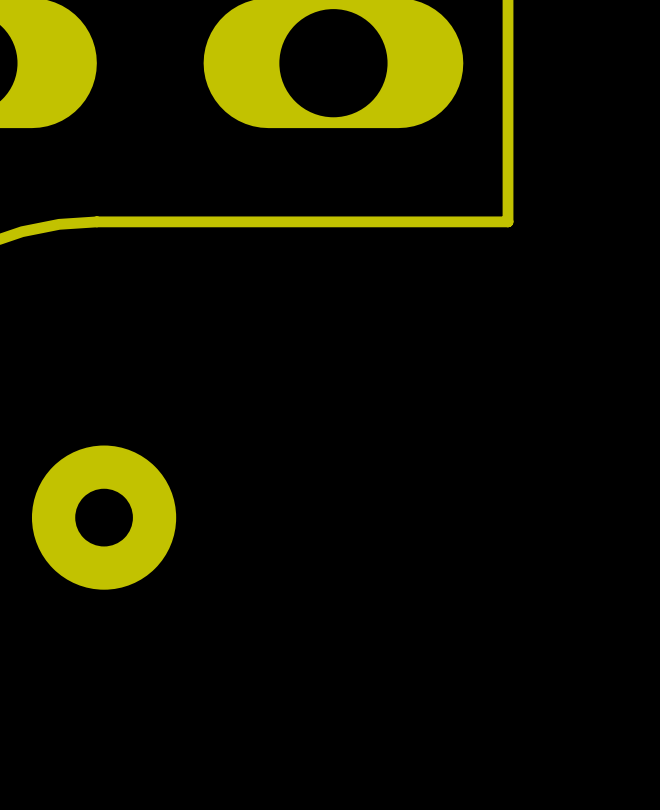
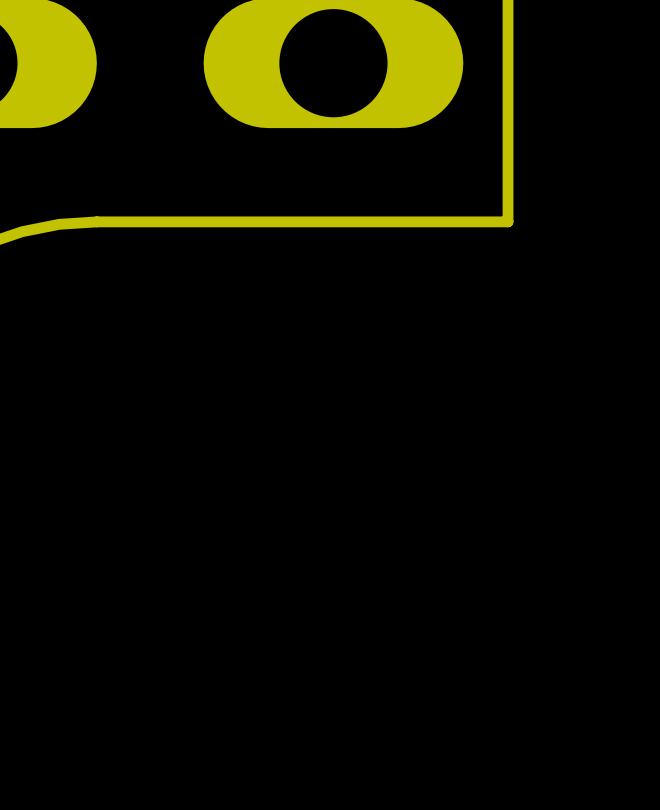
part: (104, 517) -> none

